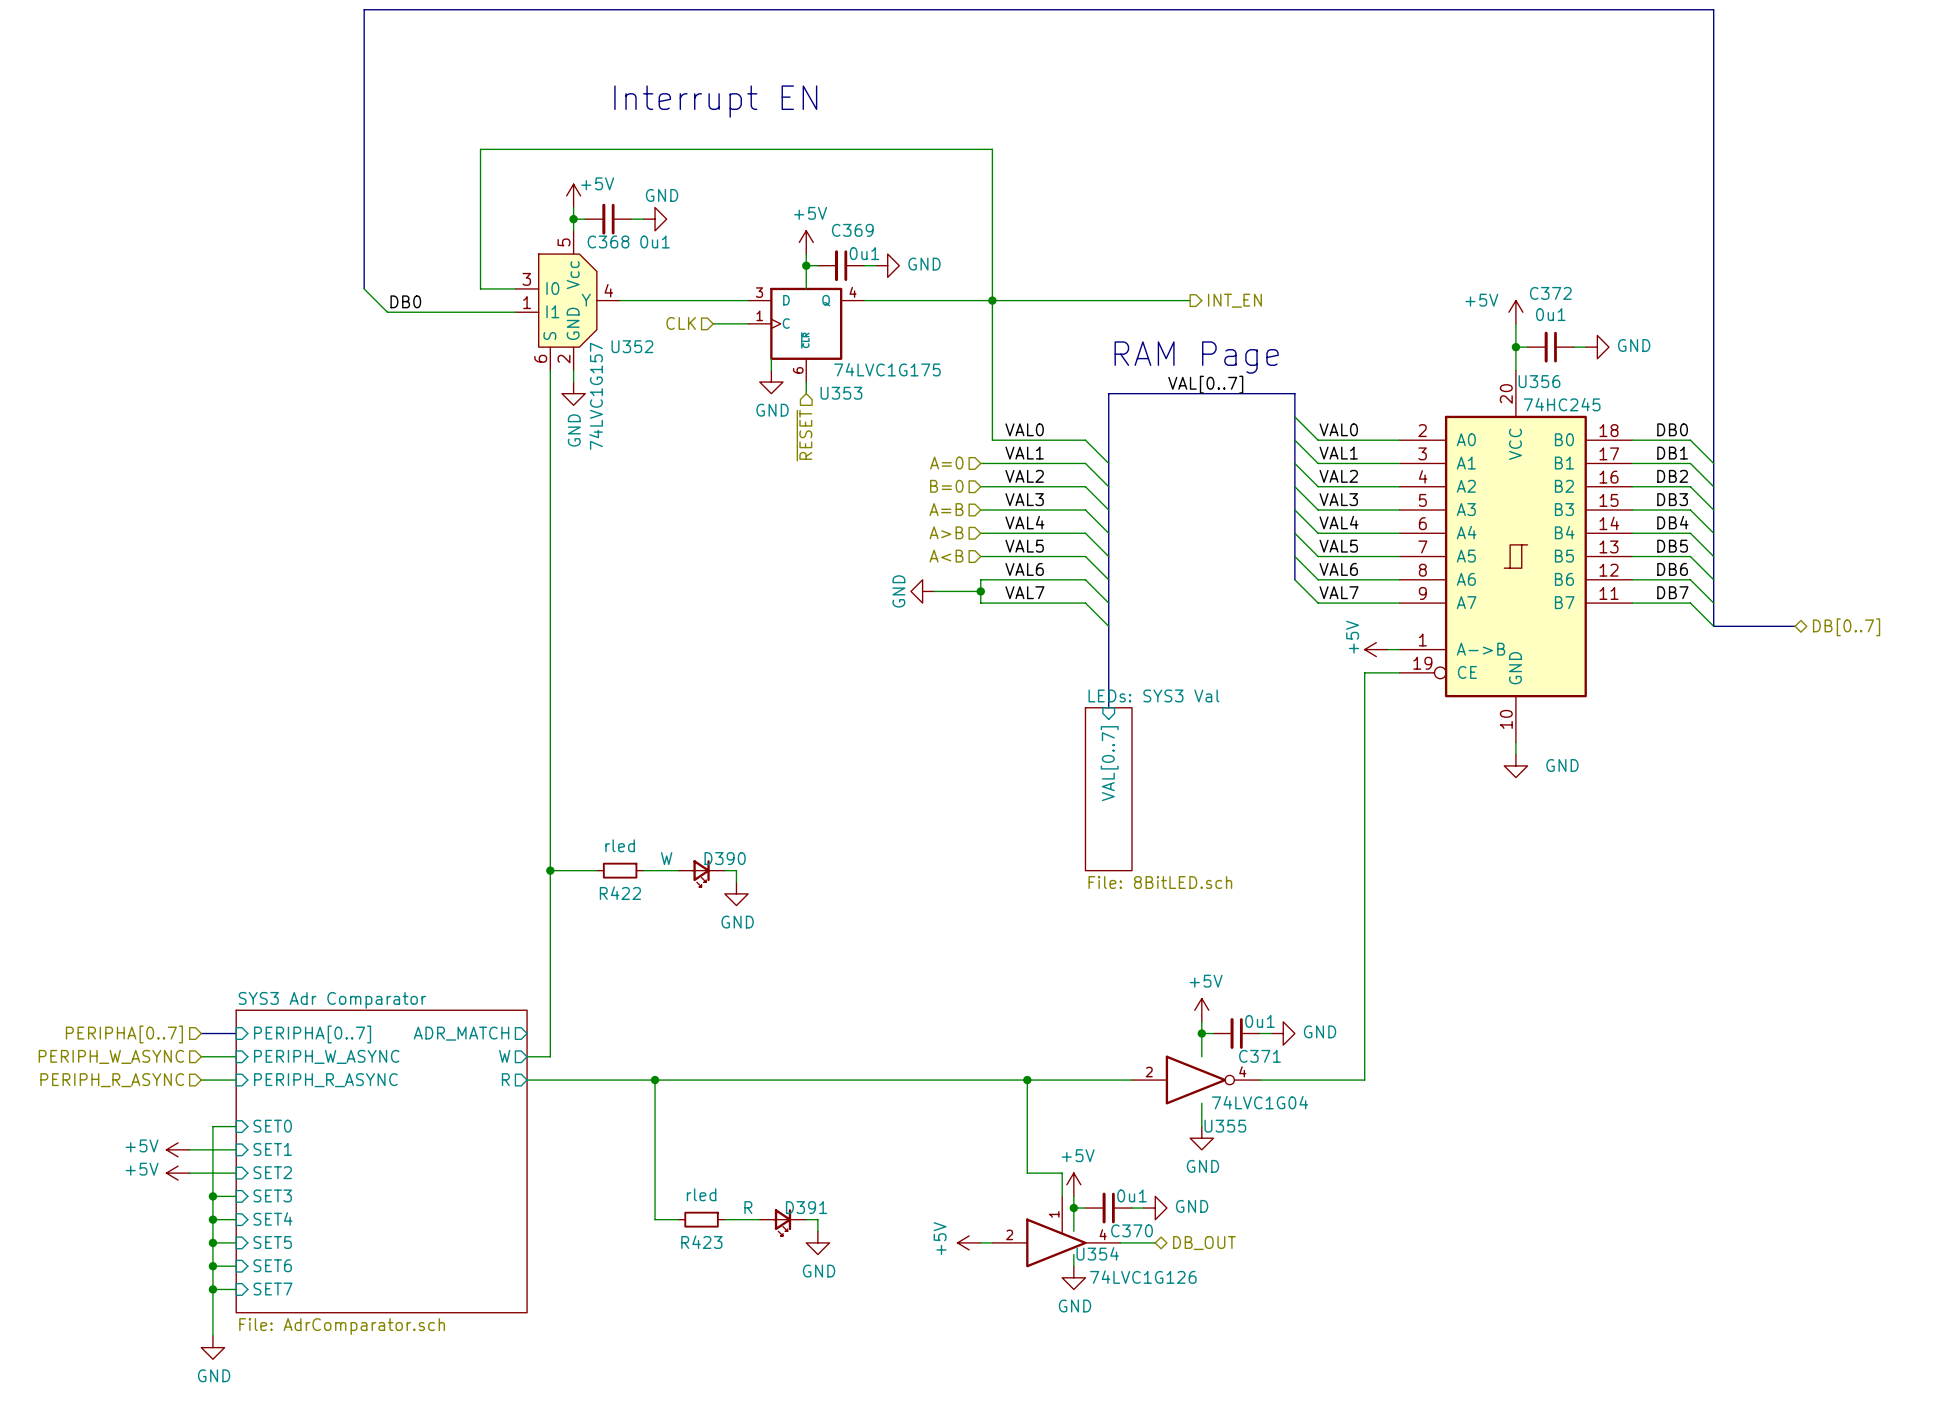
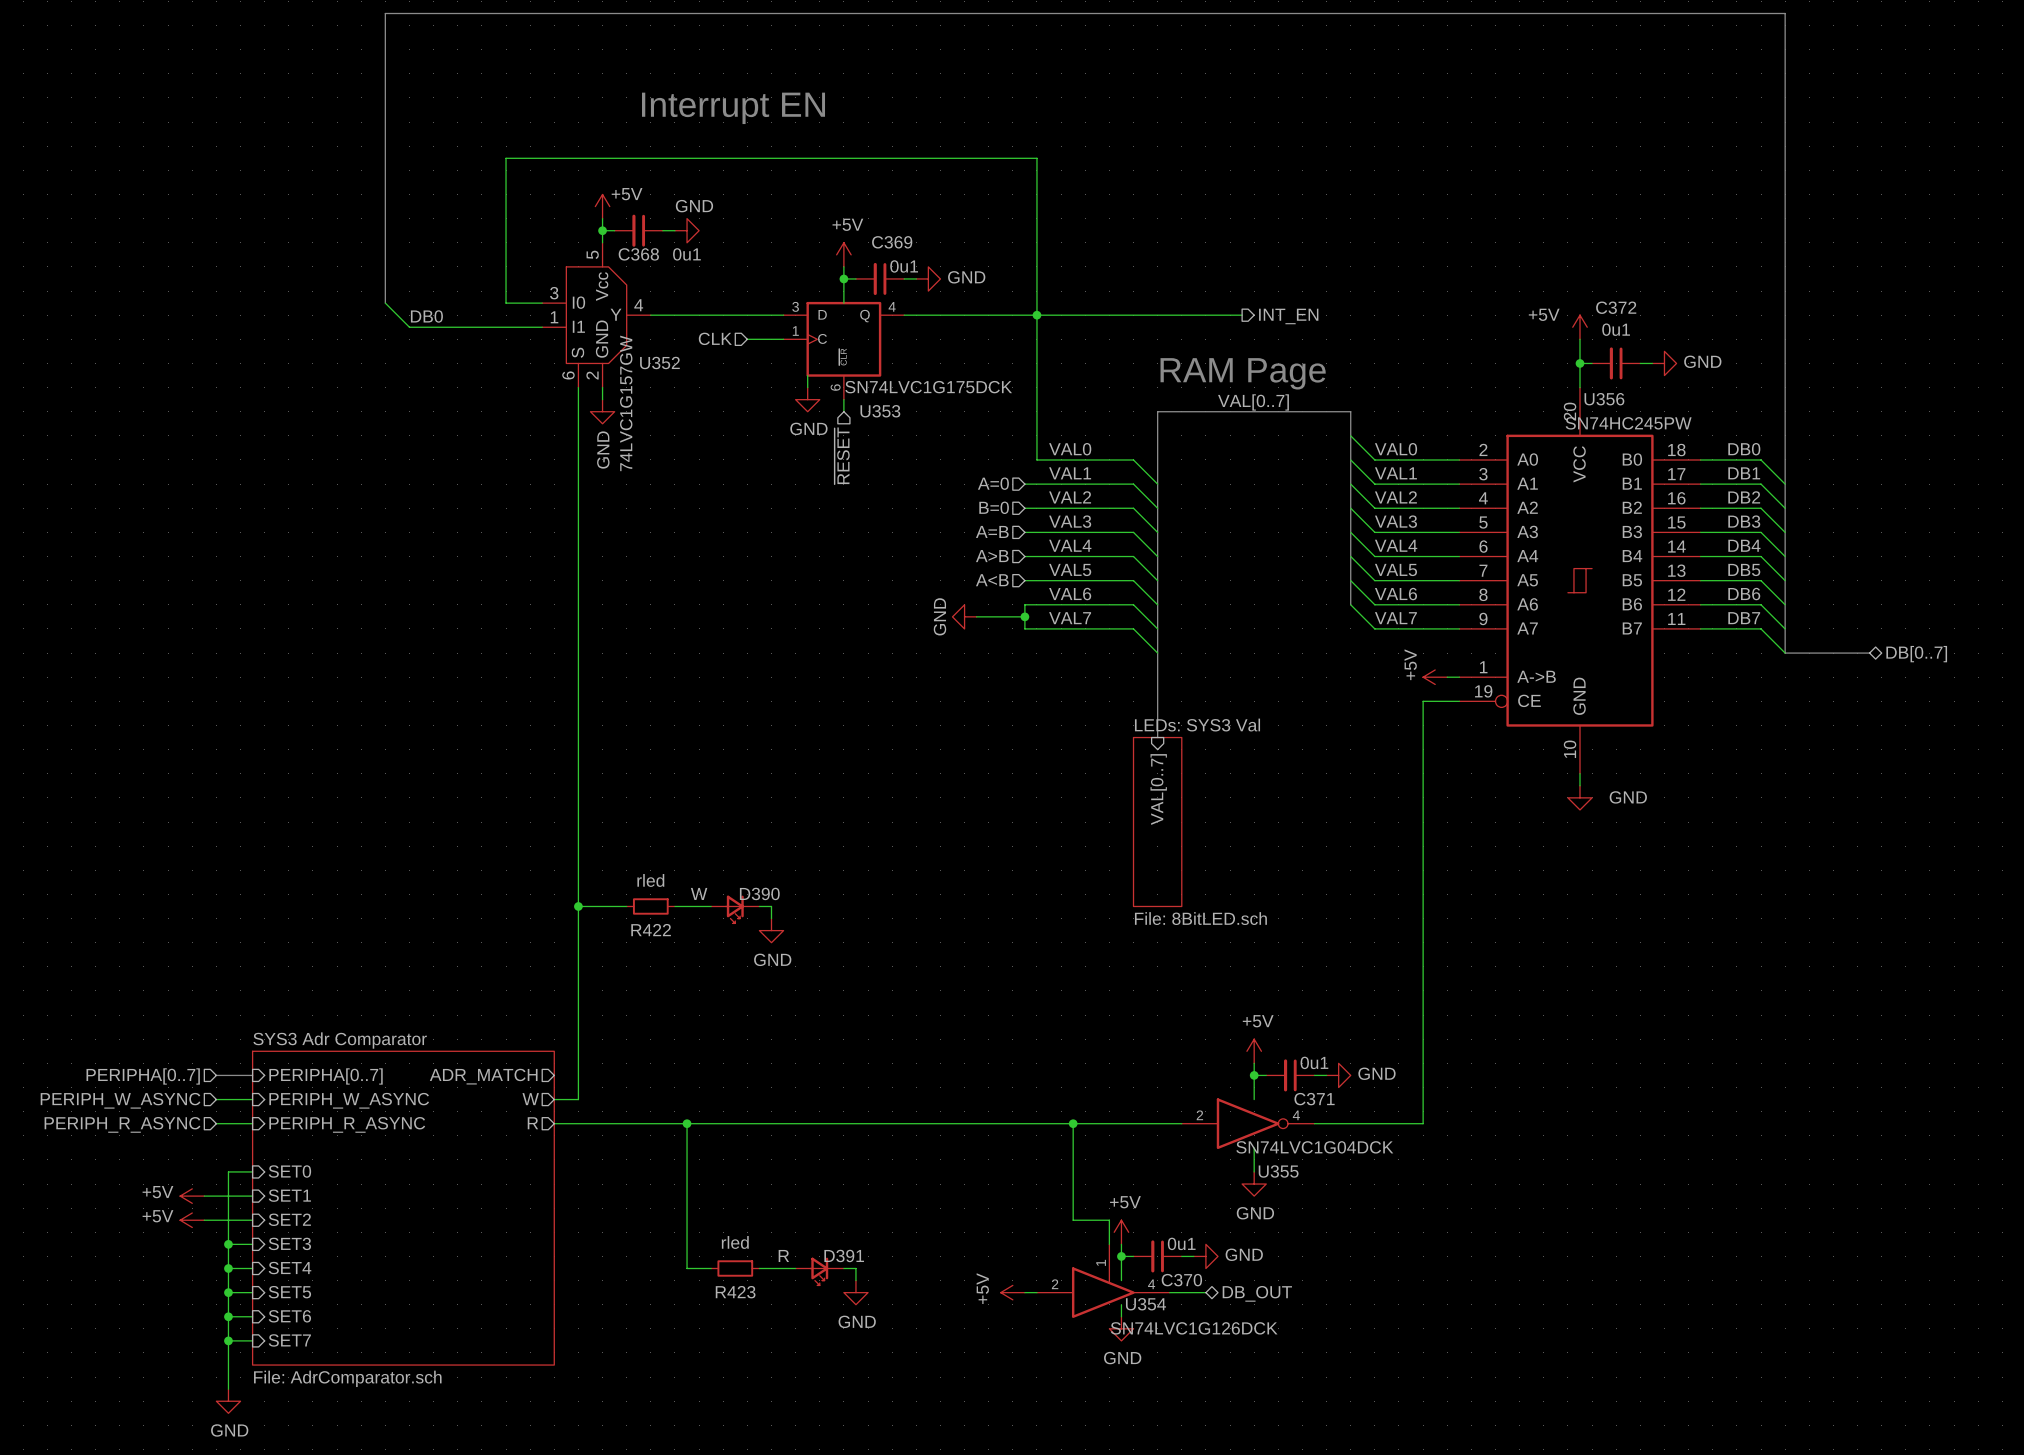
U353 value: 74LVC1G175 (887, 369) -> SN74LVC1G175DCK (928, 387)
U352 value: 74LVC1G157 (596, 396) -> 74LVC1G157GW (626, 403)
U356 value: 74HC245 (1562, 404) -> SN74HC245PW (1628, 423)
U355 value: 74LVC1G04 (1259, 1102) -> SN74LVC1G04DCK (1314, 1147)
U354 value: 74LVC1G126 (1143, 1277) -> SN74LVC1G126DCK (1194, 1328)

